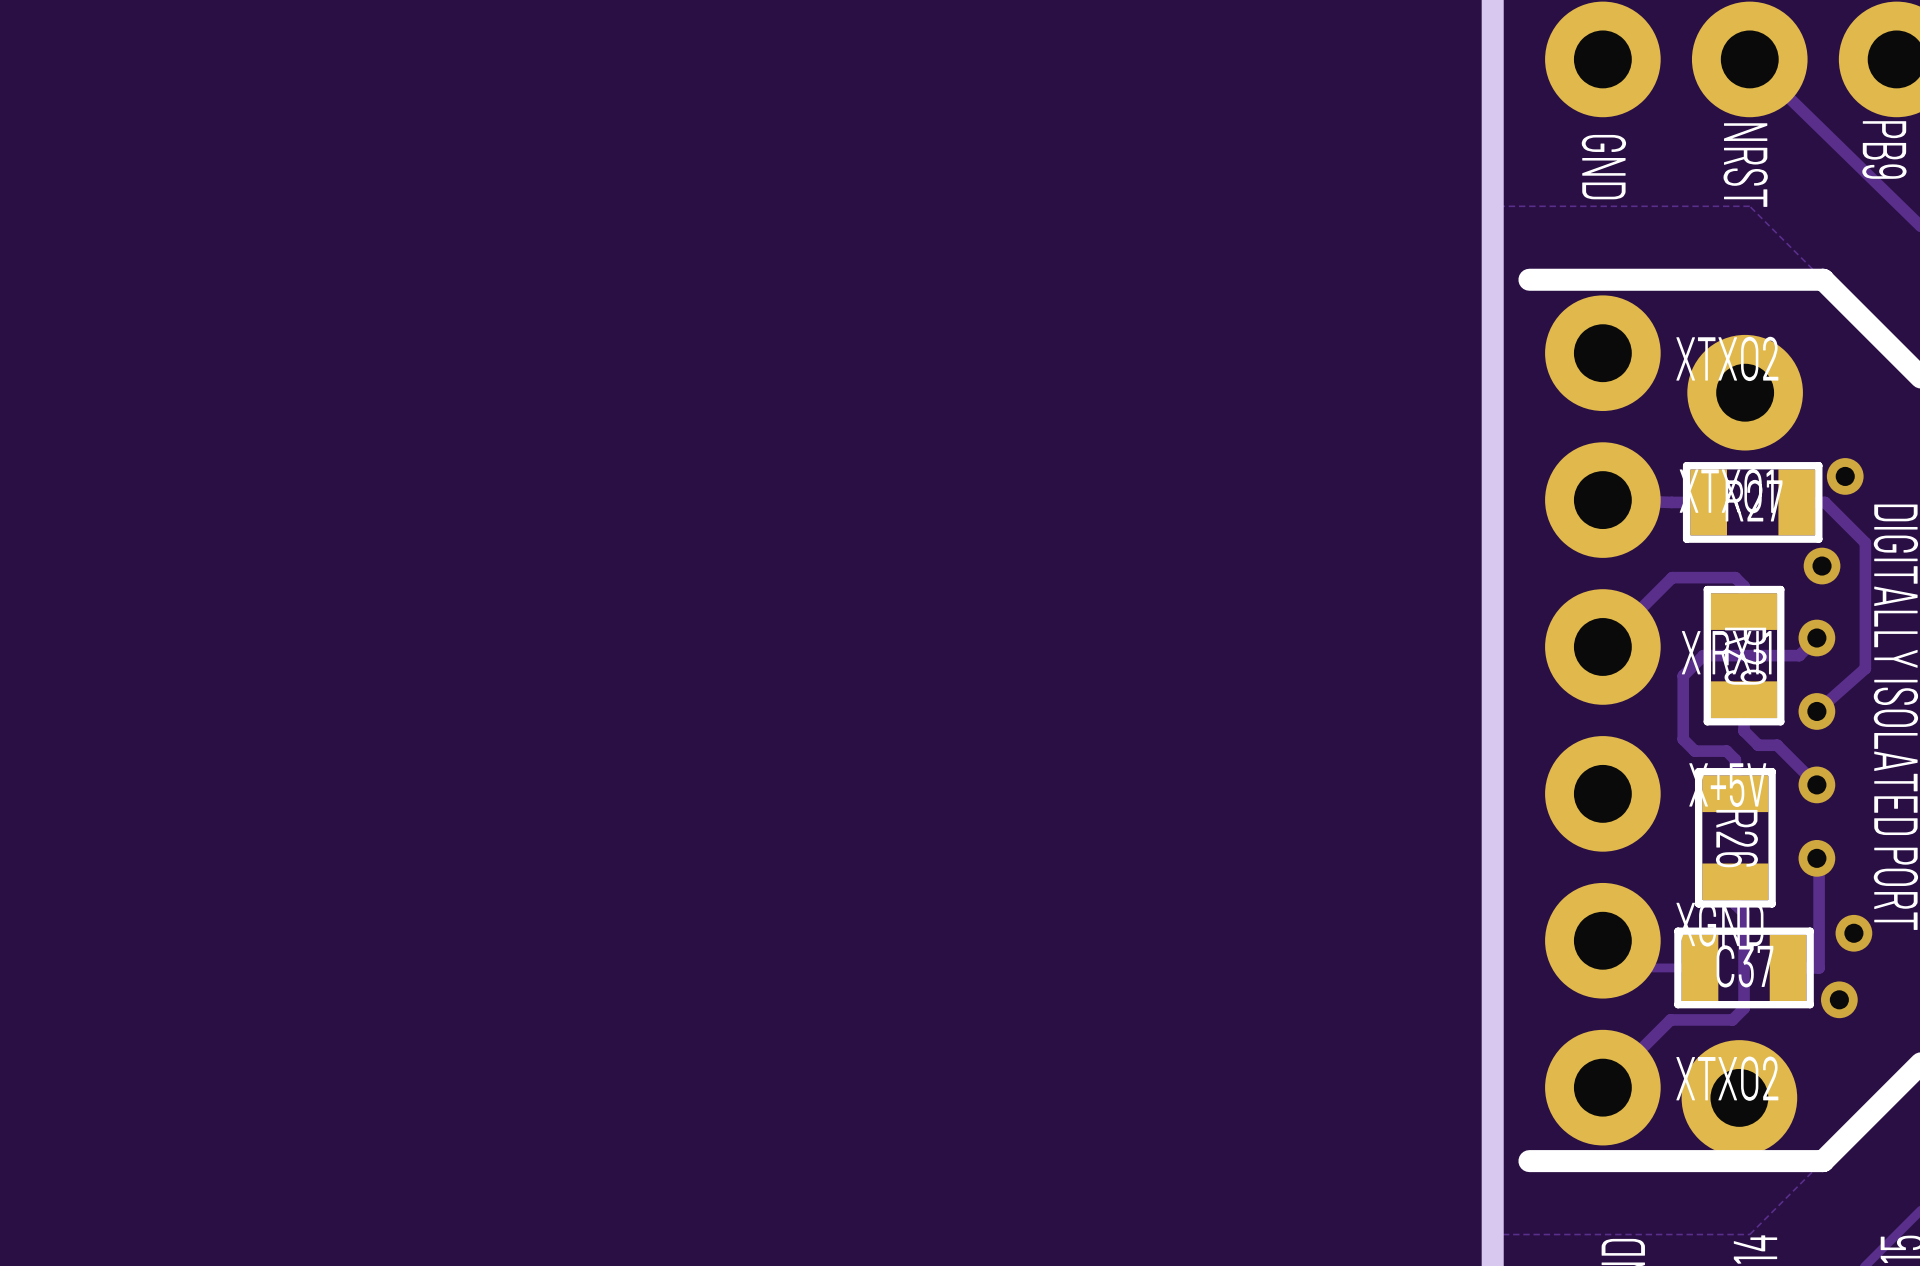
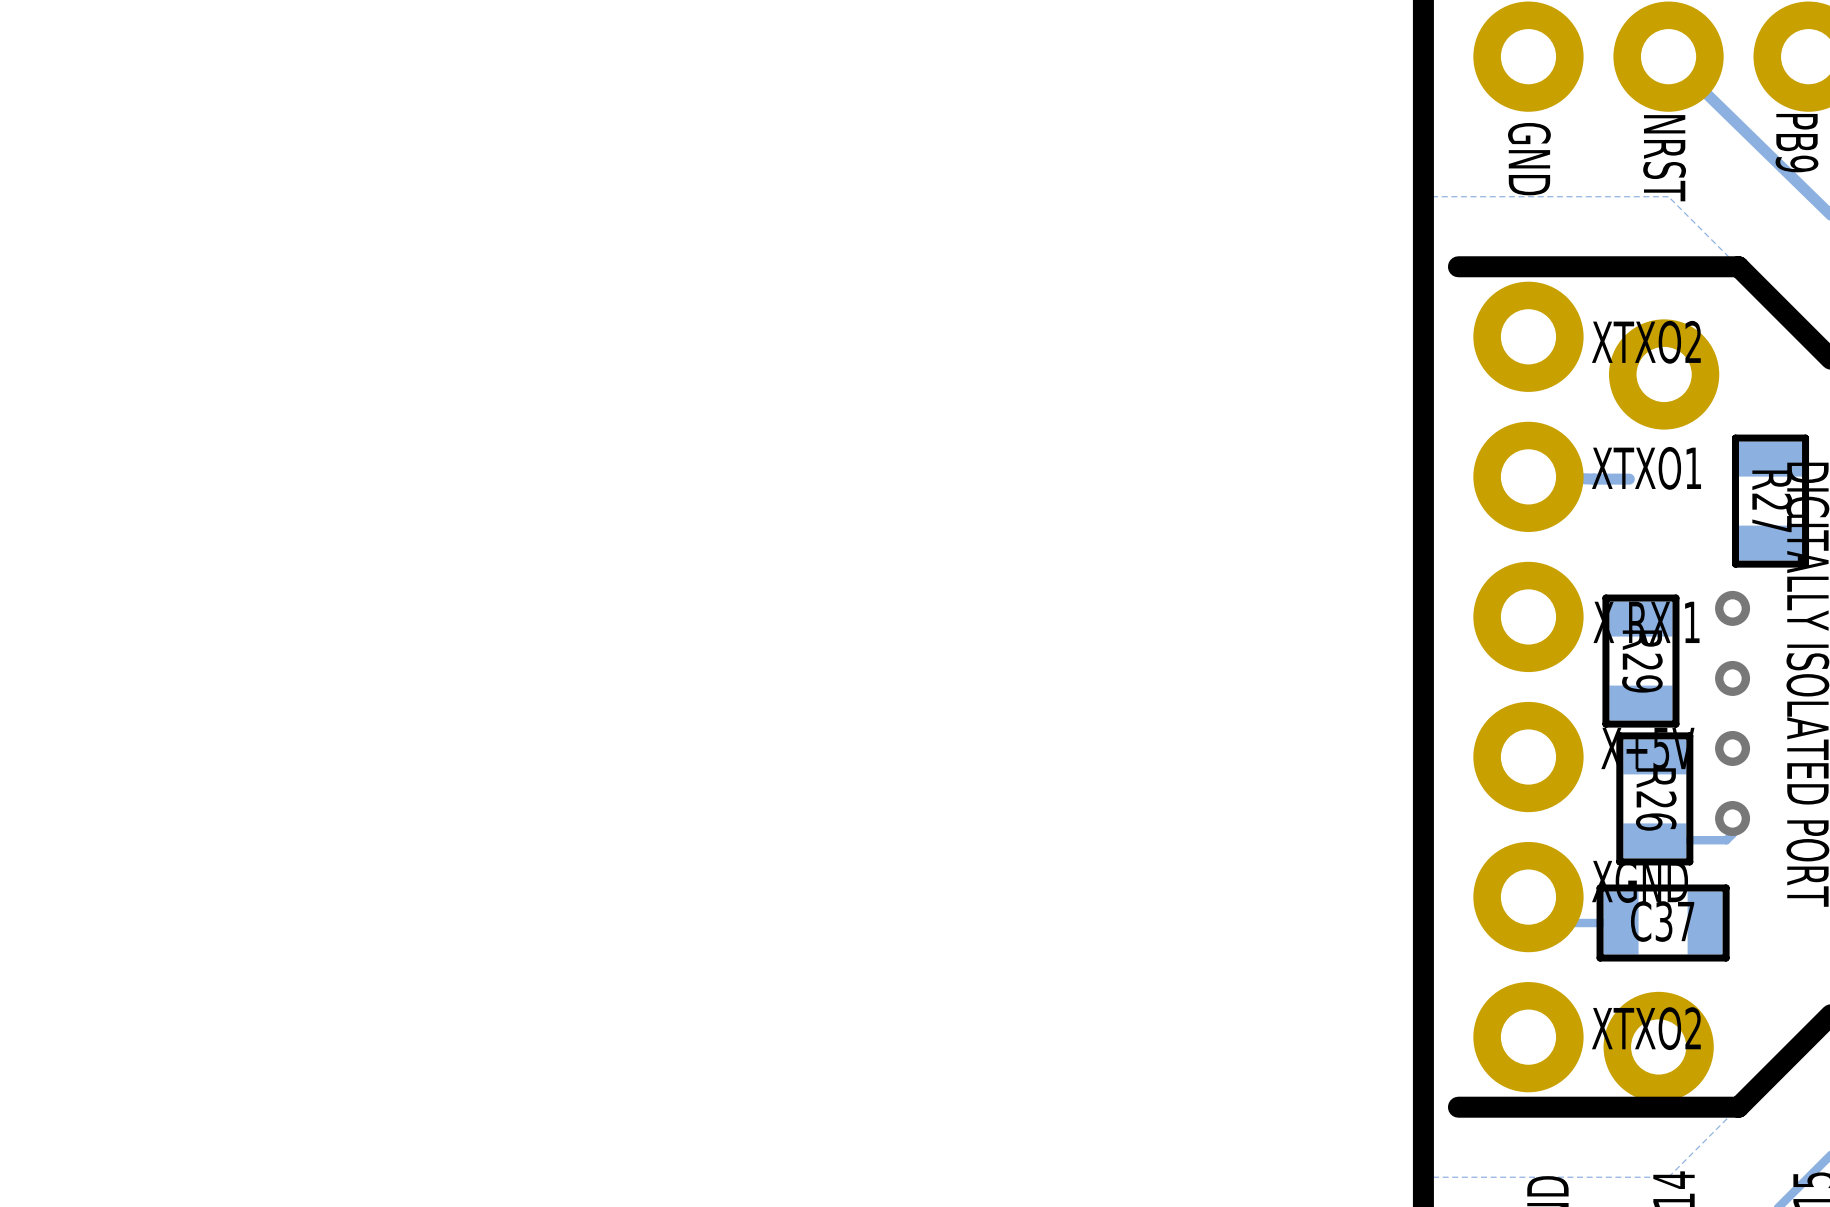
via: (1845, 476) -> none
R27 rotation: 0° (1752, 502) -> 90° clockwise (1770, 501)
R27 position: (1752, 502) -> (1770, 501)
track: (1796, 502) (1824, 502) (1865, 542) (1865, 668) (1816, 711) -> none
via: (1822, 566) -> none
track: (1744, 611) (1744, 586) (1735, 577) (1672, 577) (1602, 646) -> none
track: (1816, 638) (1799, 655) (1703, 655) (1683, 675) (1683, 739) (1694, 751) (1726, 751) (1735, 759) (1735, 793) -> none
R29 position: (1744, 655) -> (1640, 661)
track: (1744, 699) (1744, 731) (1758, 745) (1777, 745) (1816, 784) -> none
track: (1816, 858) (1819, 860) (1819, 967) (1788, 967) -> (1732, 818) (1732, 834) (1726, 840) (1688, 840)
track: (1735, 881) (1735, 904) (1744, 913) (1744, 1008) (1732, 1019) (1670, 1019) (1602, 1087) -> none
via: (1853, 933) -> none
via: (1839, 999) -> none

